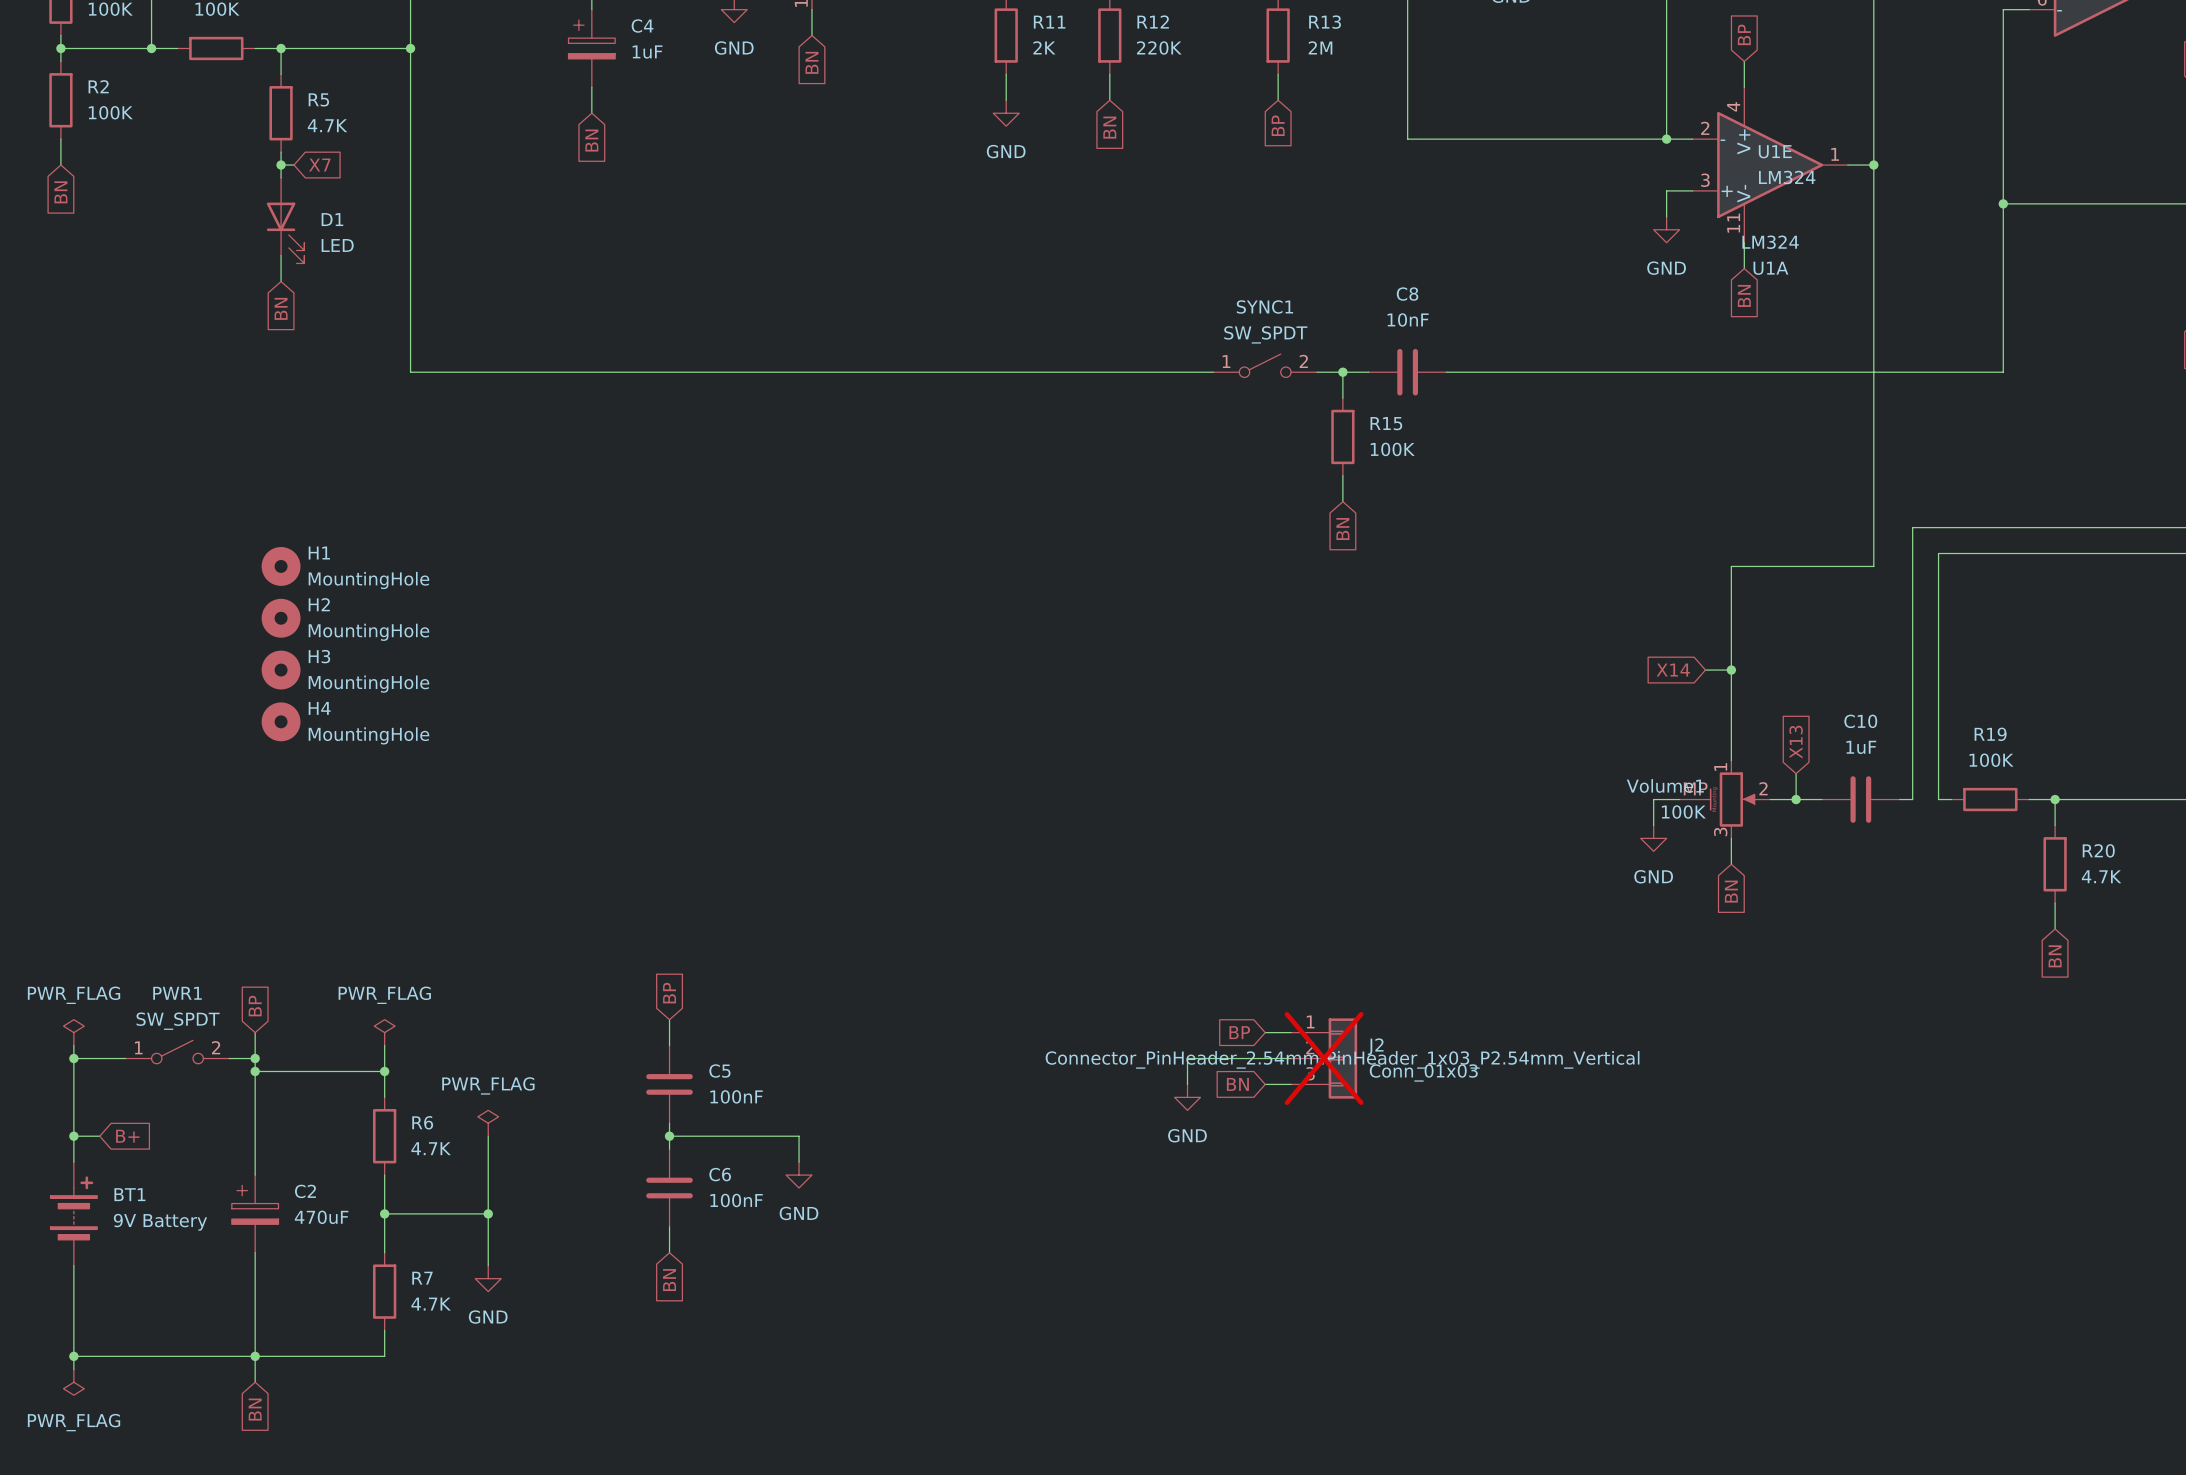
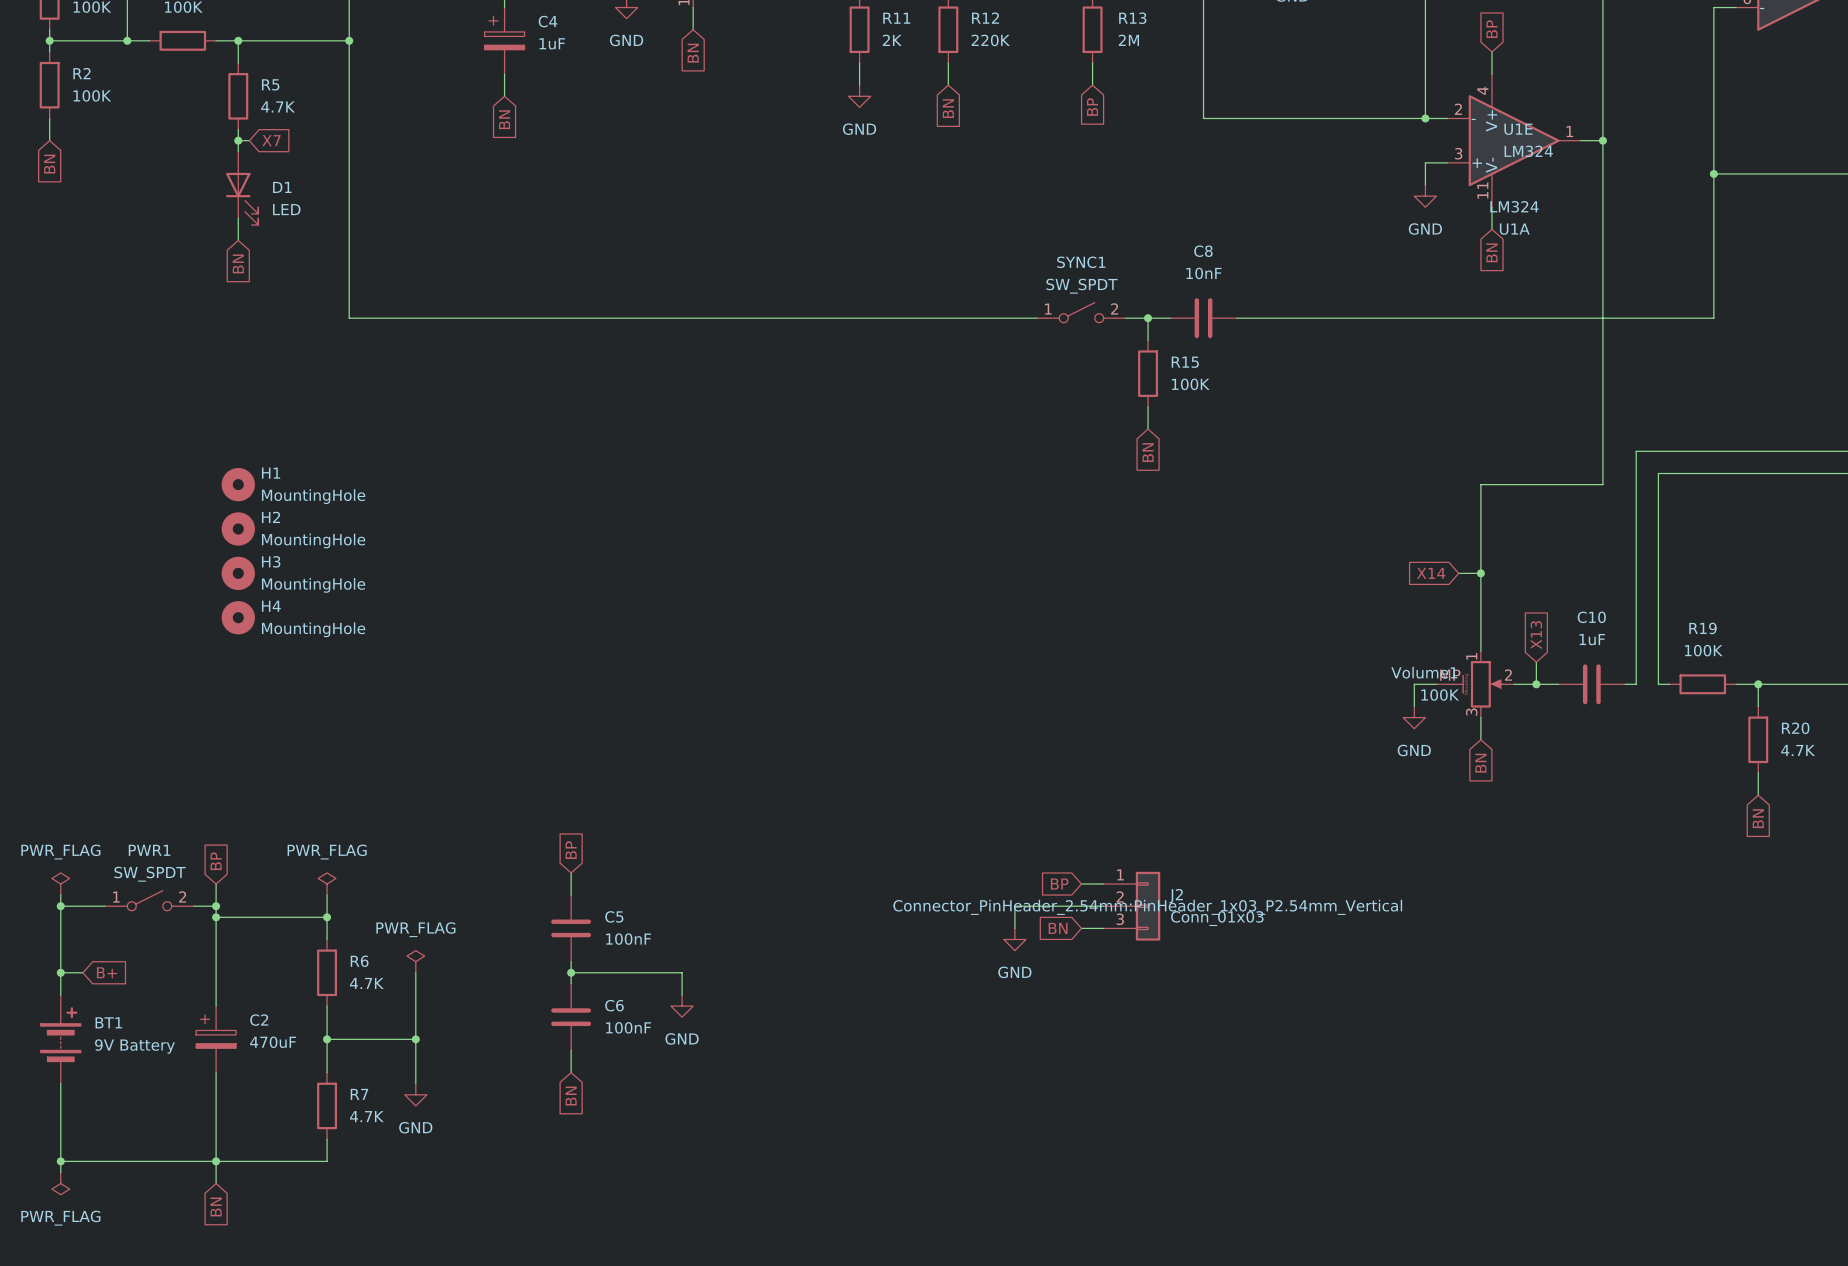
J2 do-not-place cross: (1324, 1058) -> none

